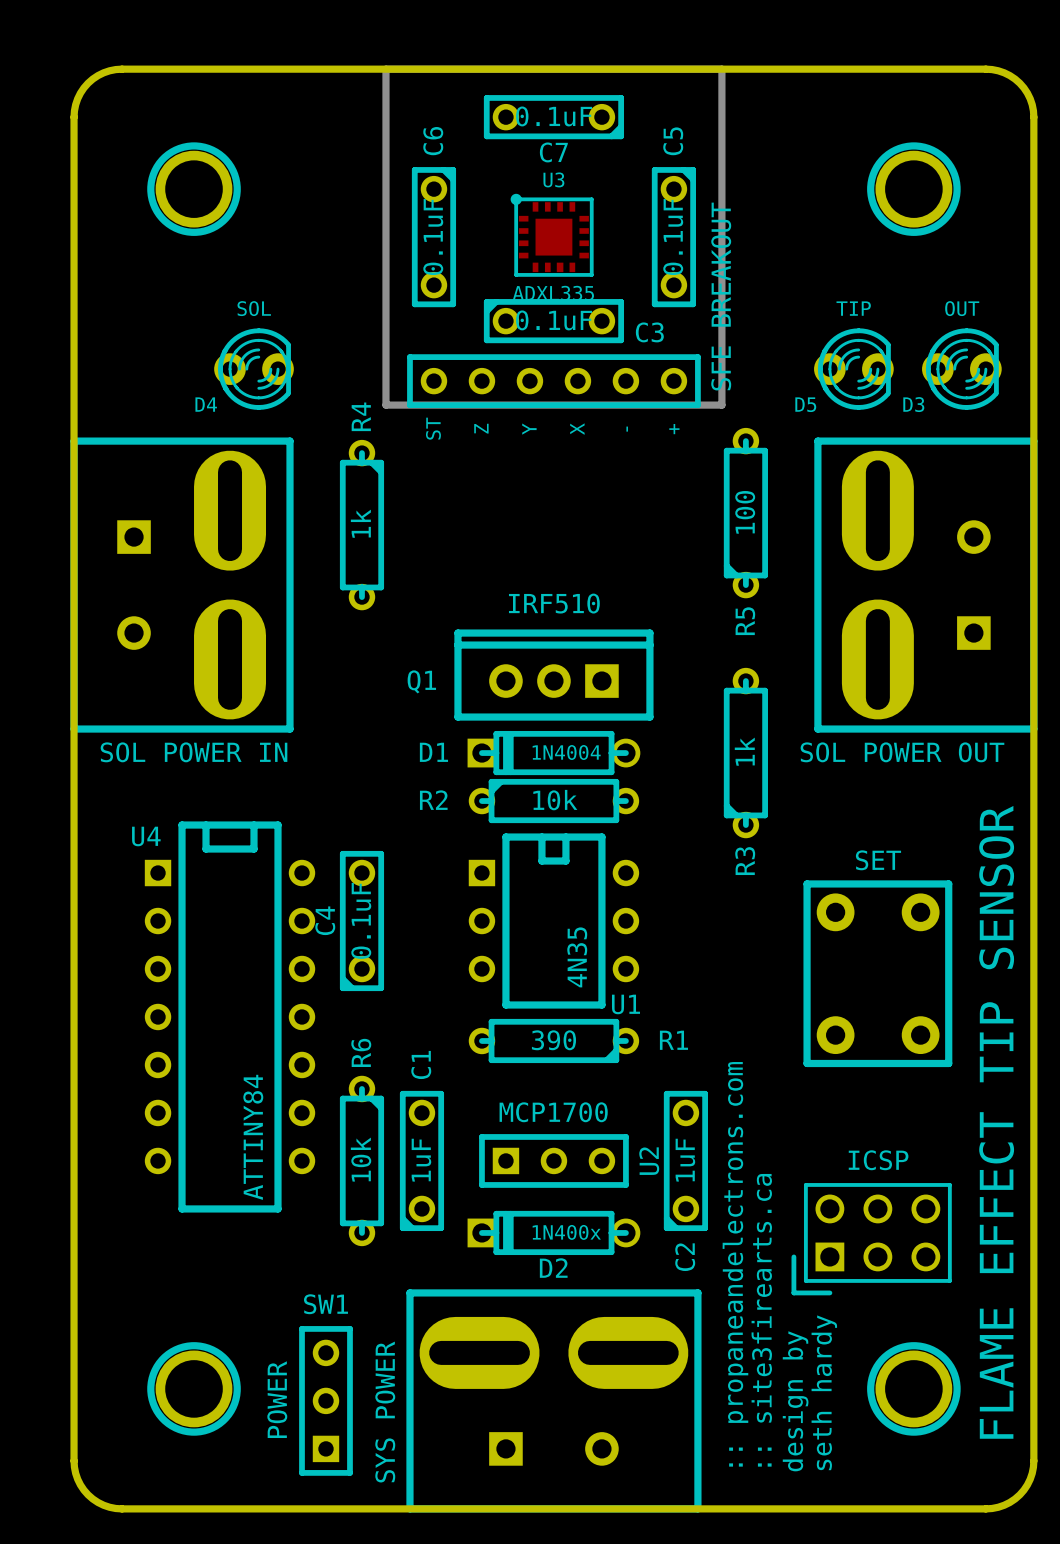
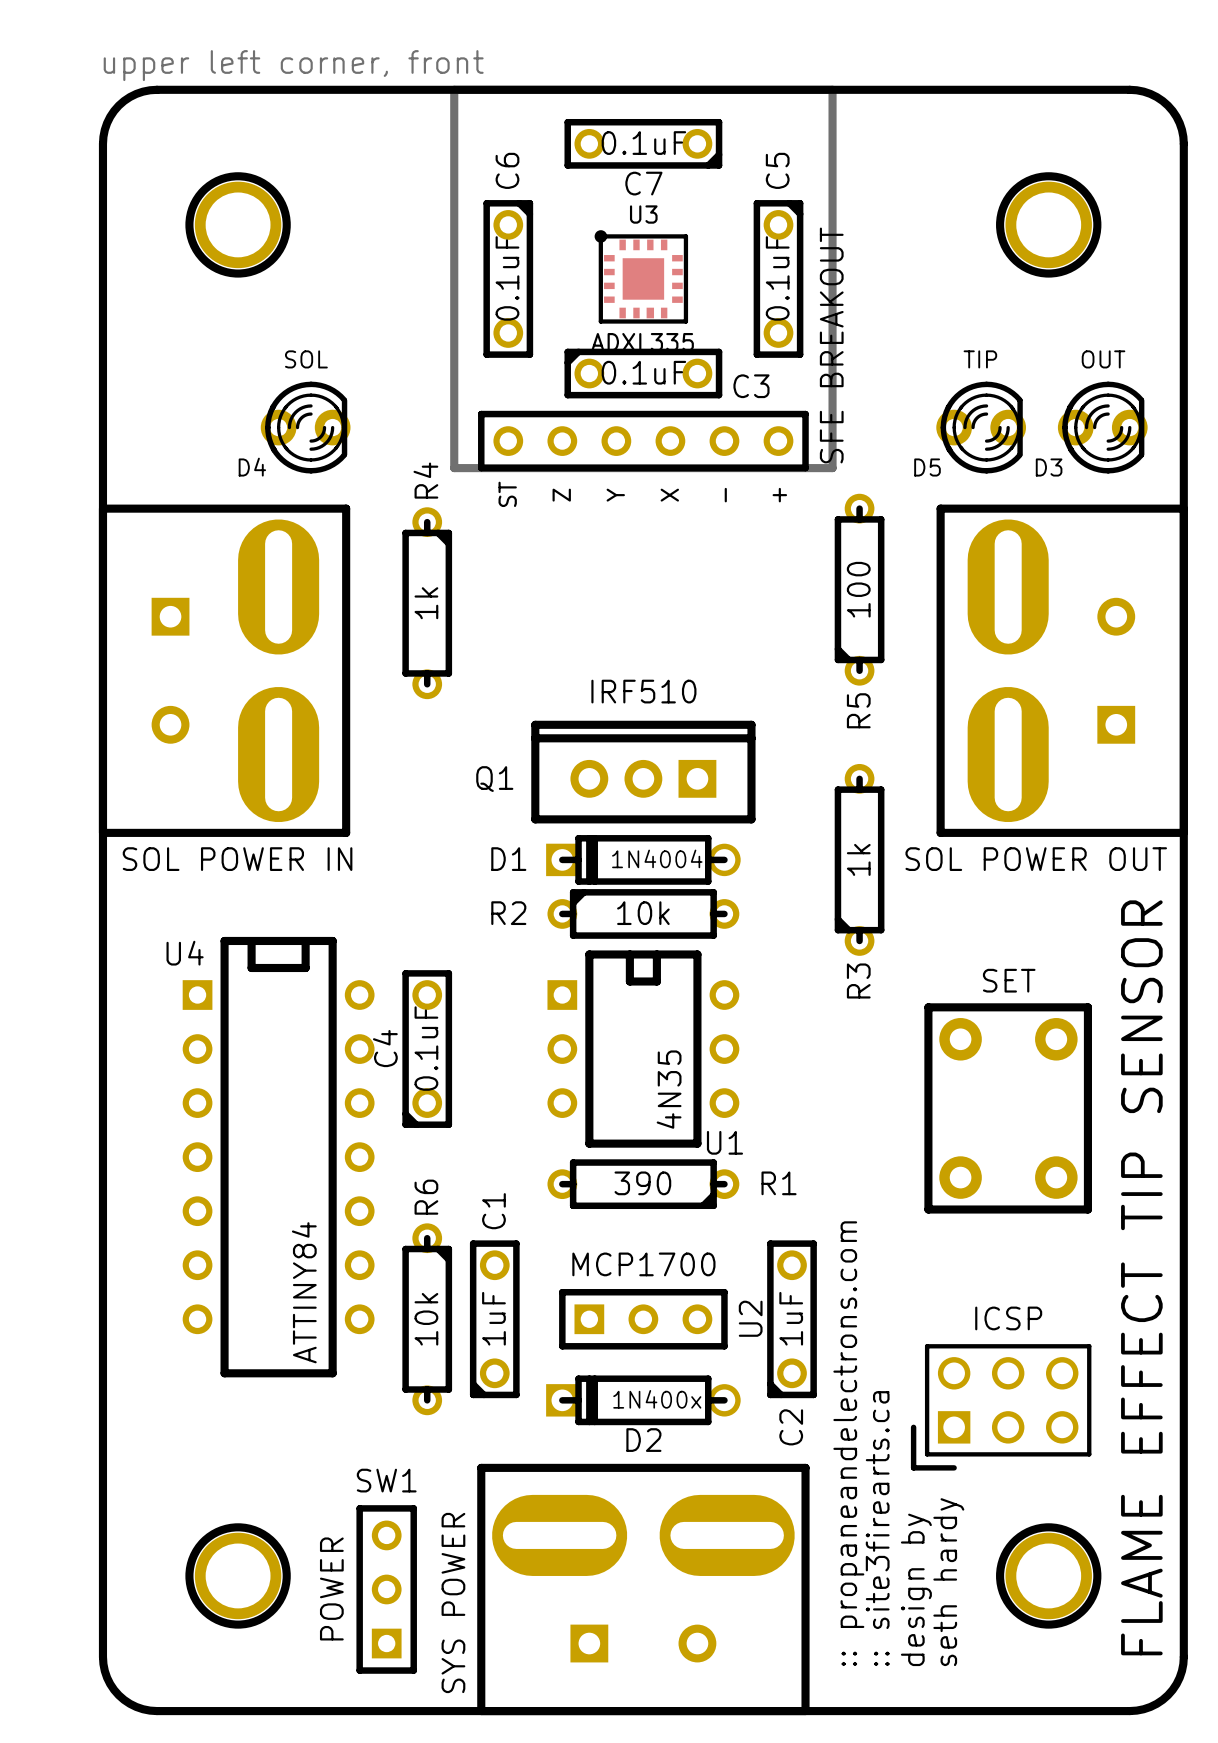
text: none -> upper left corner, front (293, 65)

